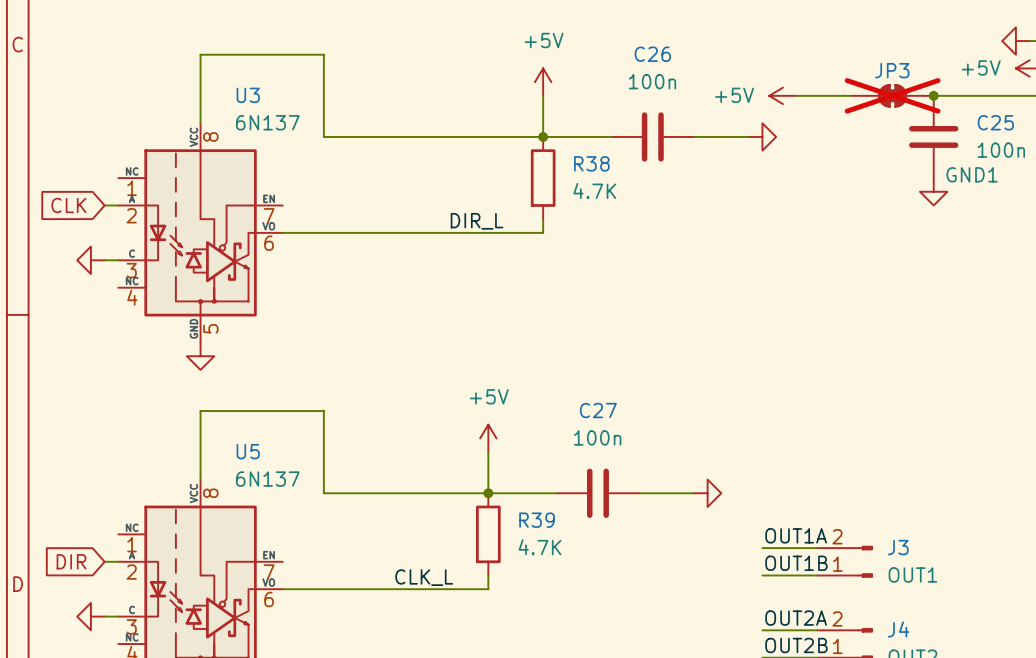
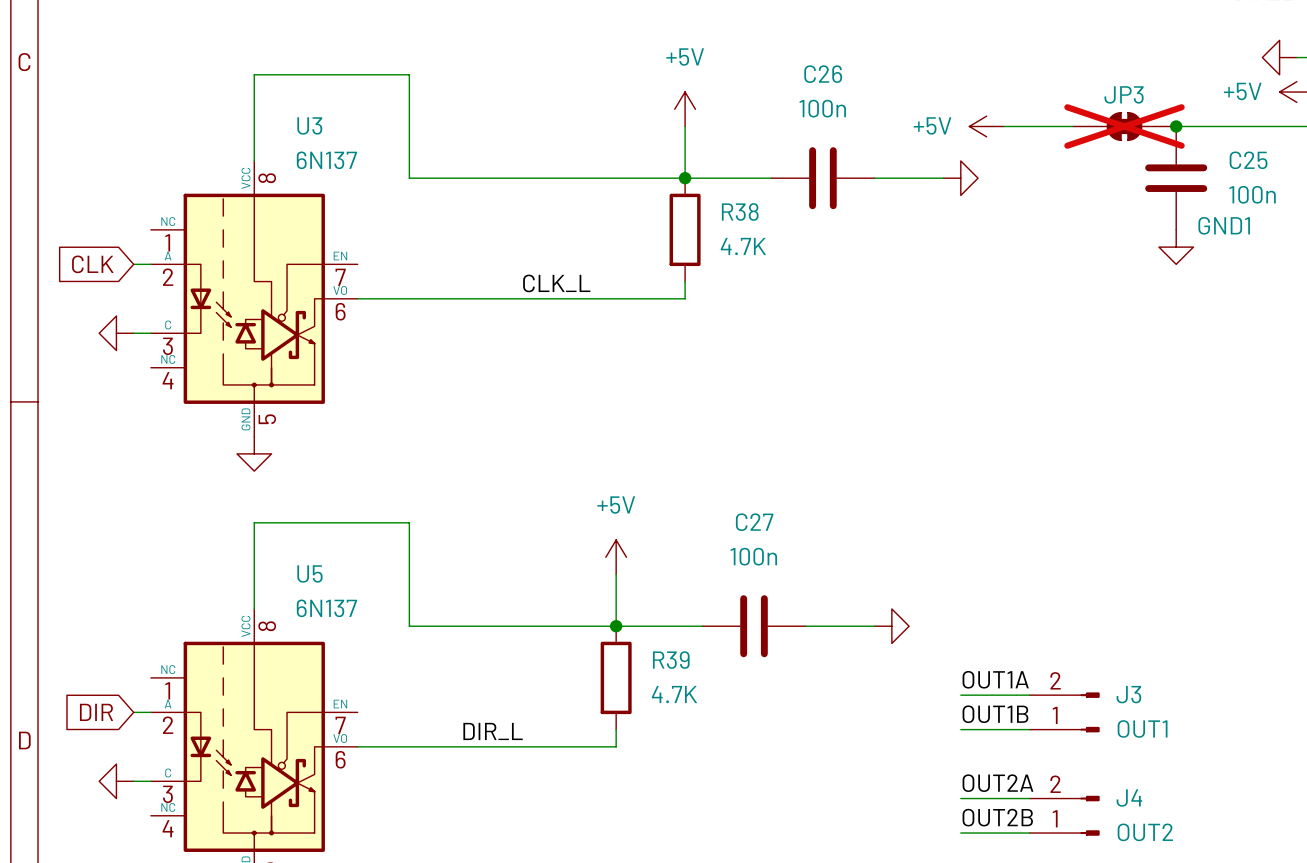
label: none -> CLK_L (556, 283)
label: DIR_L (477, 221) -> none
label: none -> DIR_L (493, 731)
label: CLK_L (424, 577) -> none

